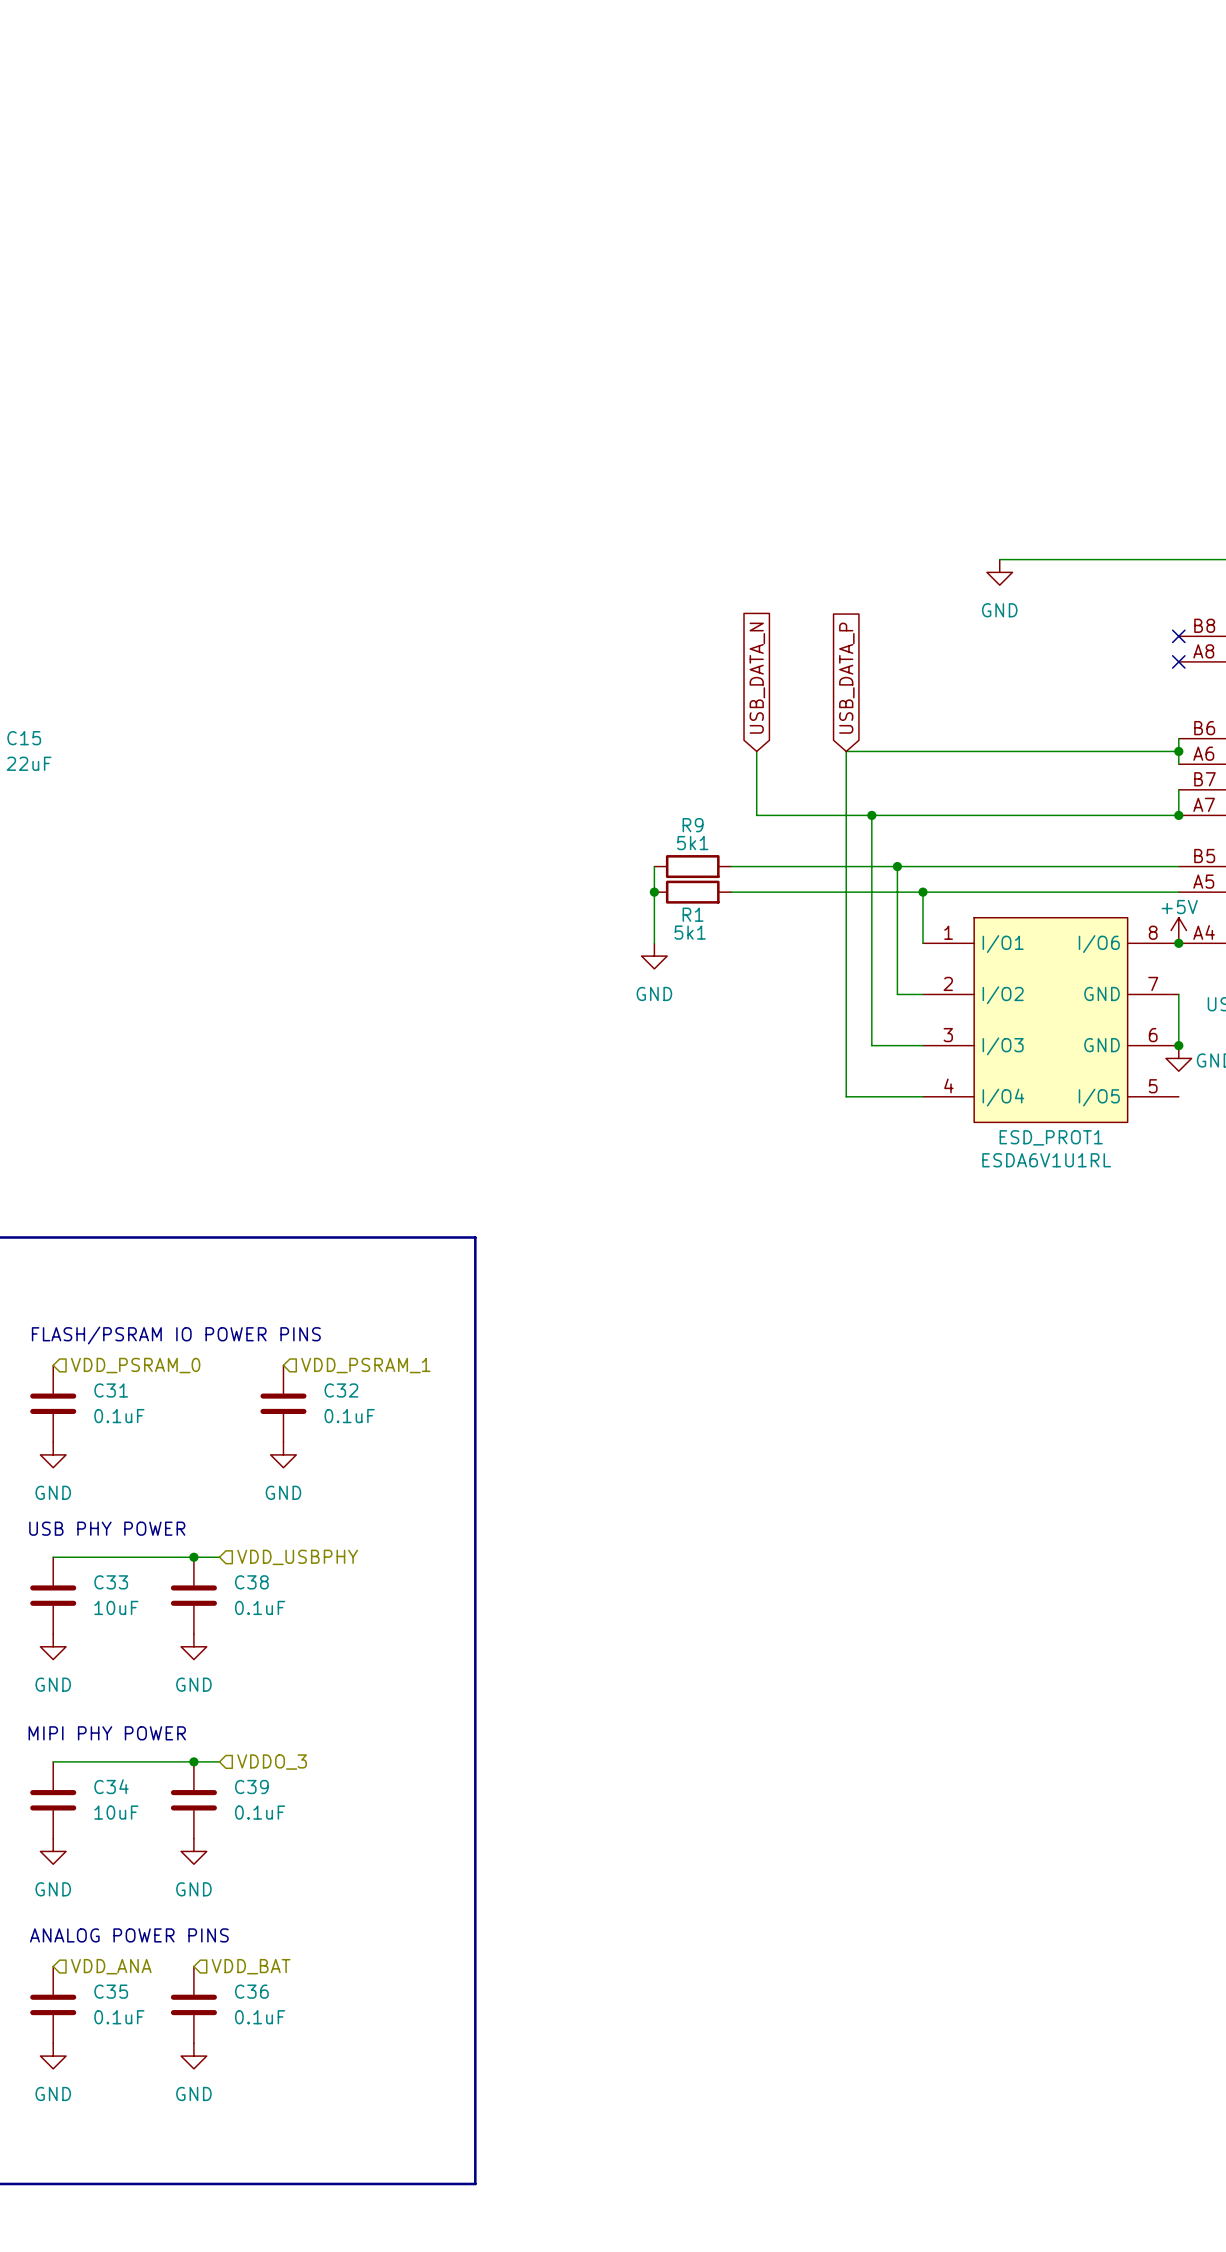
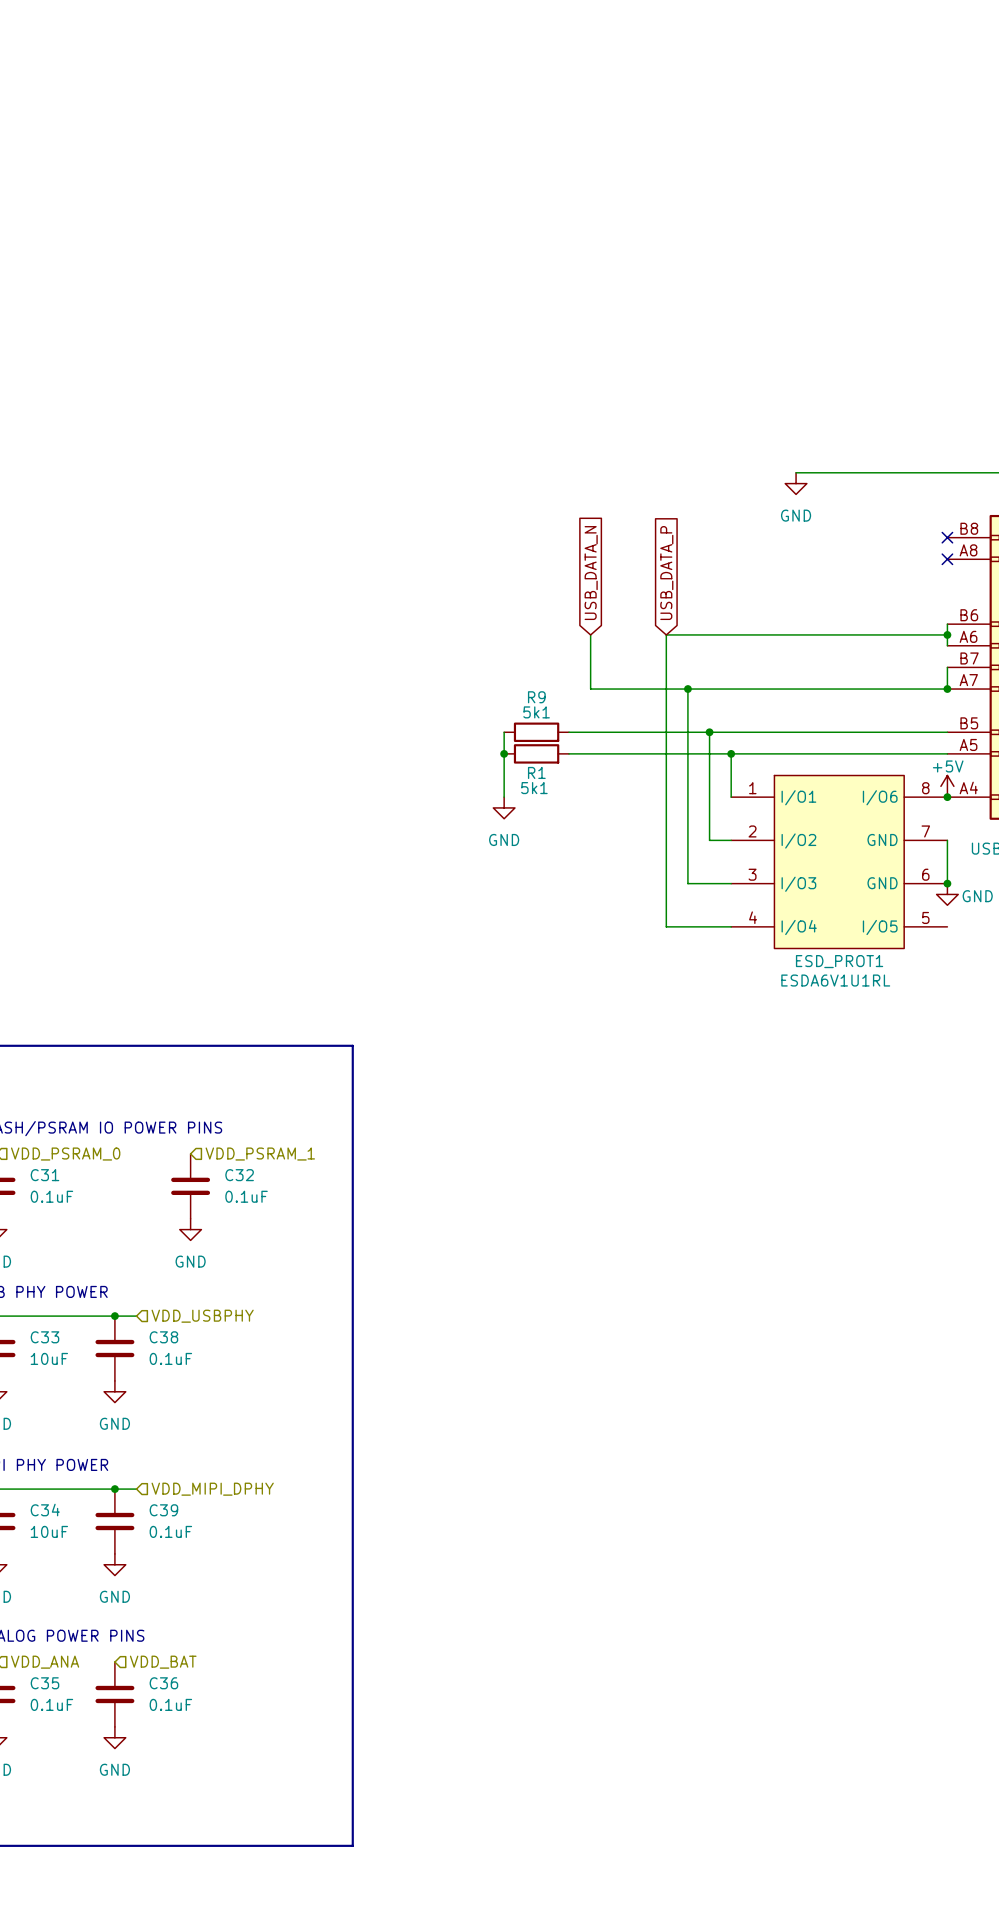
hierarchical label: VDDO_3 (272, 1762) -> VDD_MIPI_DPHY (212, 1489)

